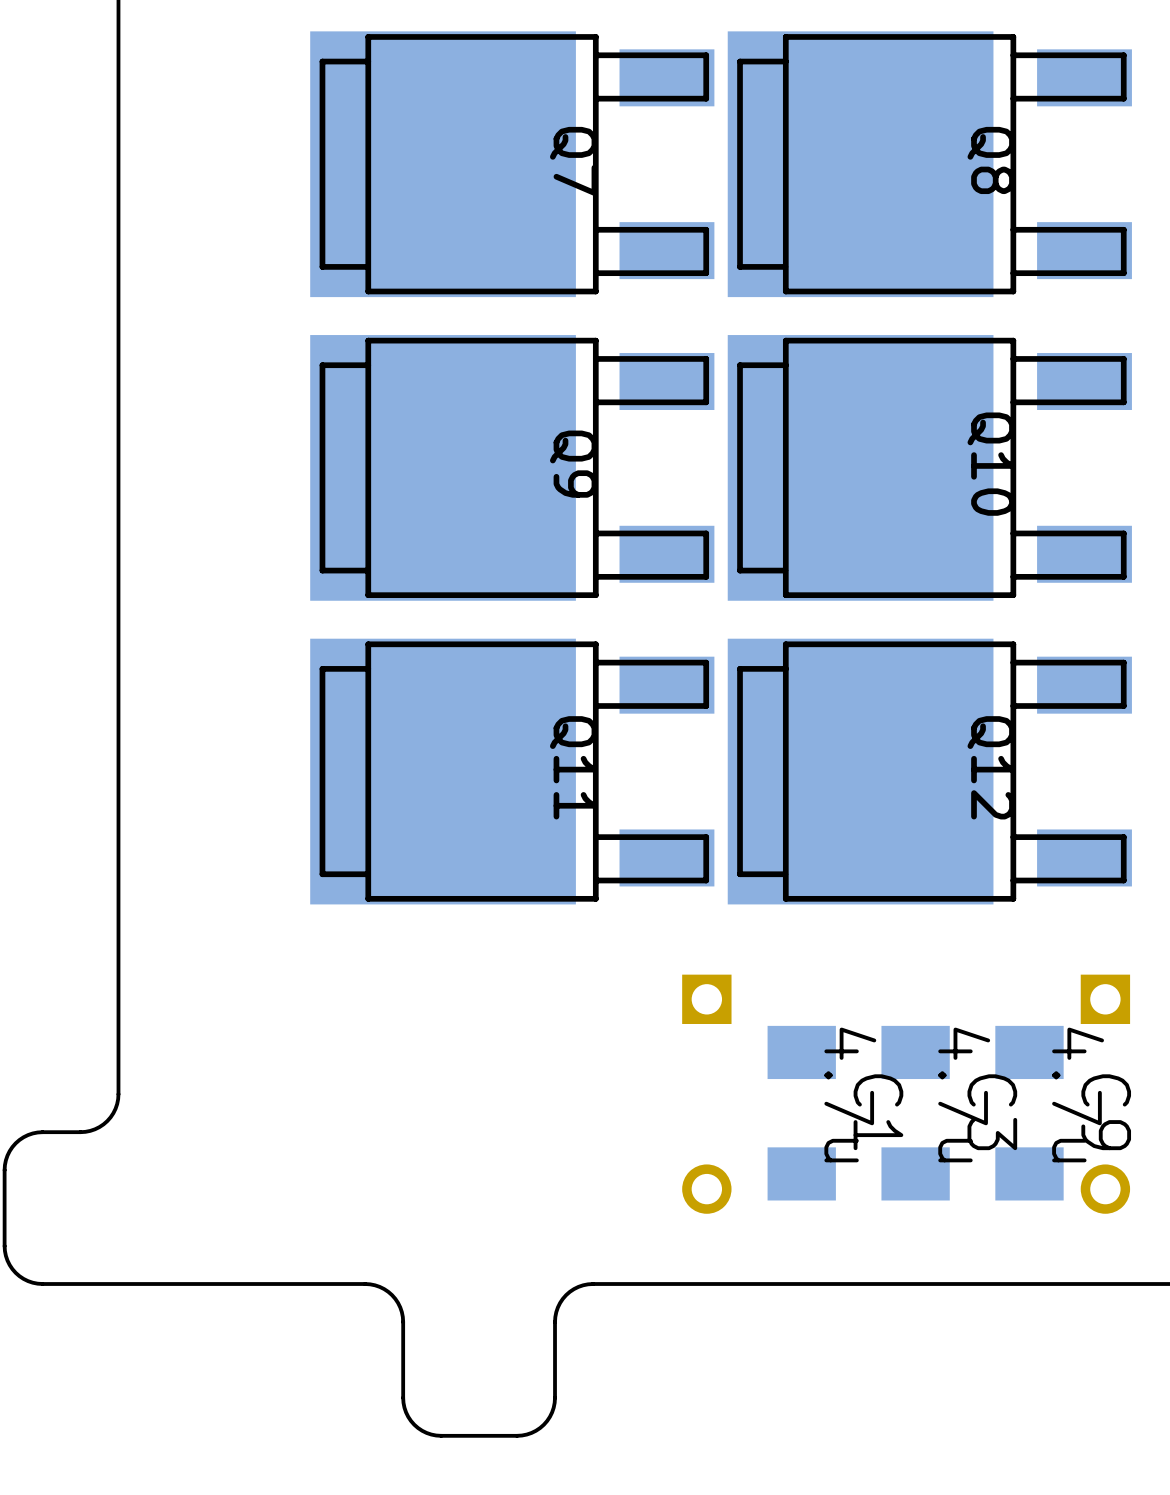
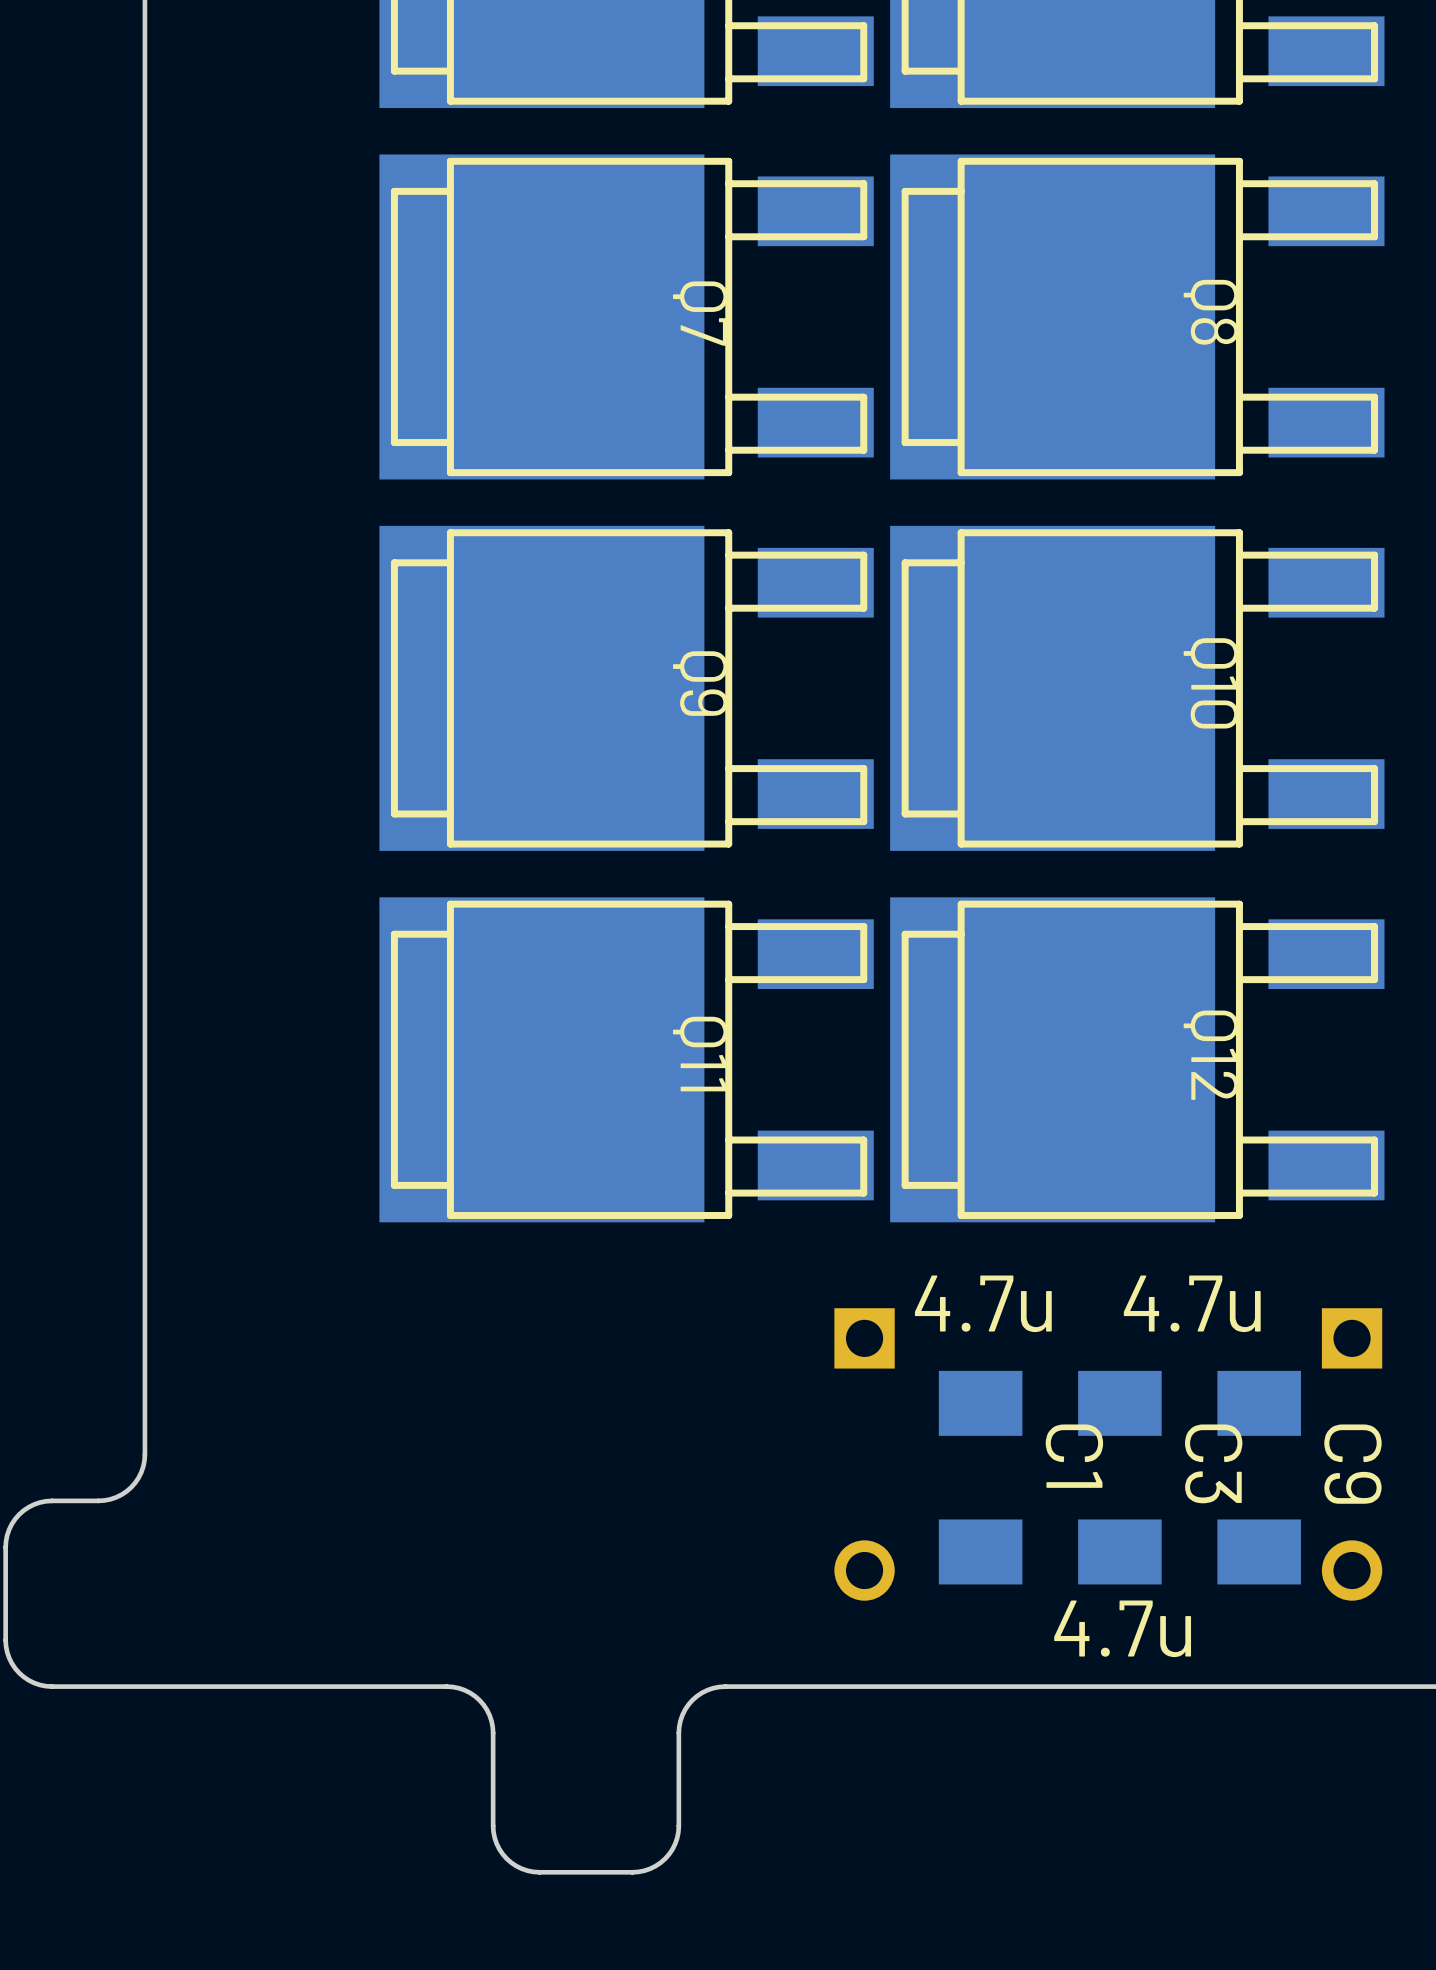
C1 value rotation: 0° (850, 1094) -> 90° counterclockwise (983, 1303)
C3 value rotation: 0° (964, 1094) -> 90° counterclockwise (1122, 1628)
C9 value rotation: 0° (1078, 1094) -> 90° counterclockwise (1192, 1303)

